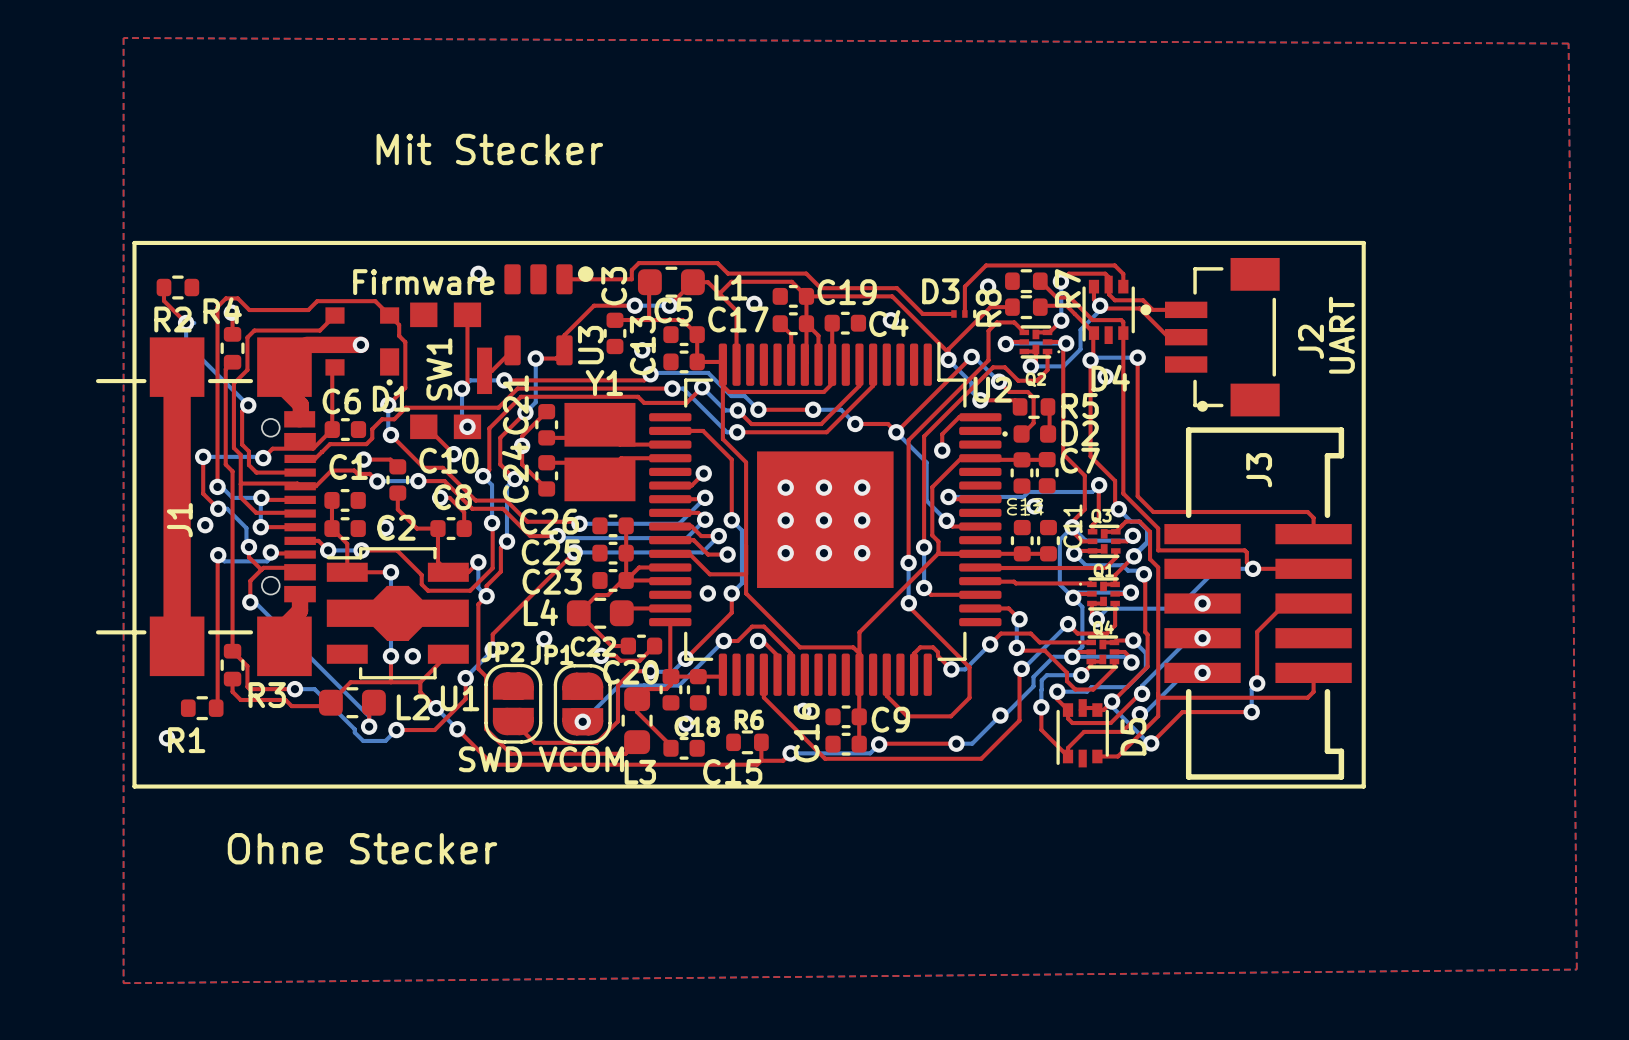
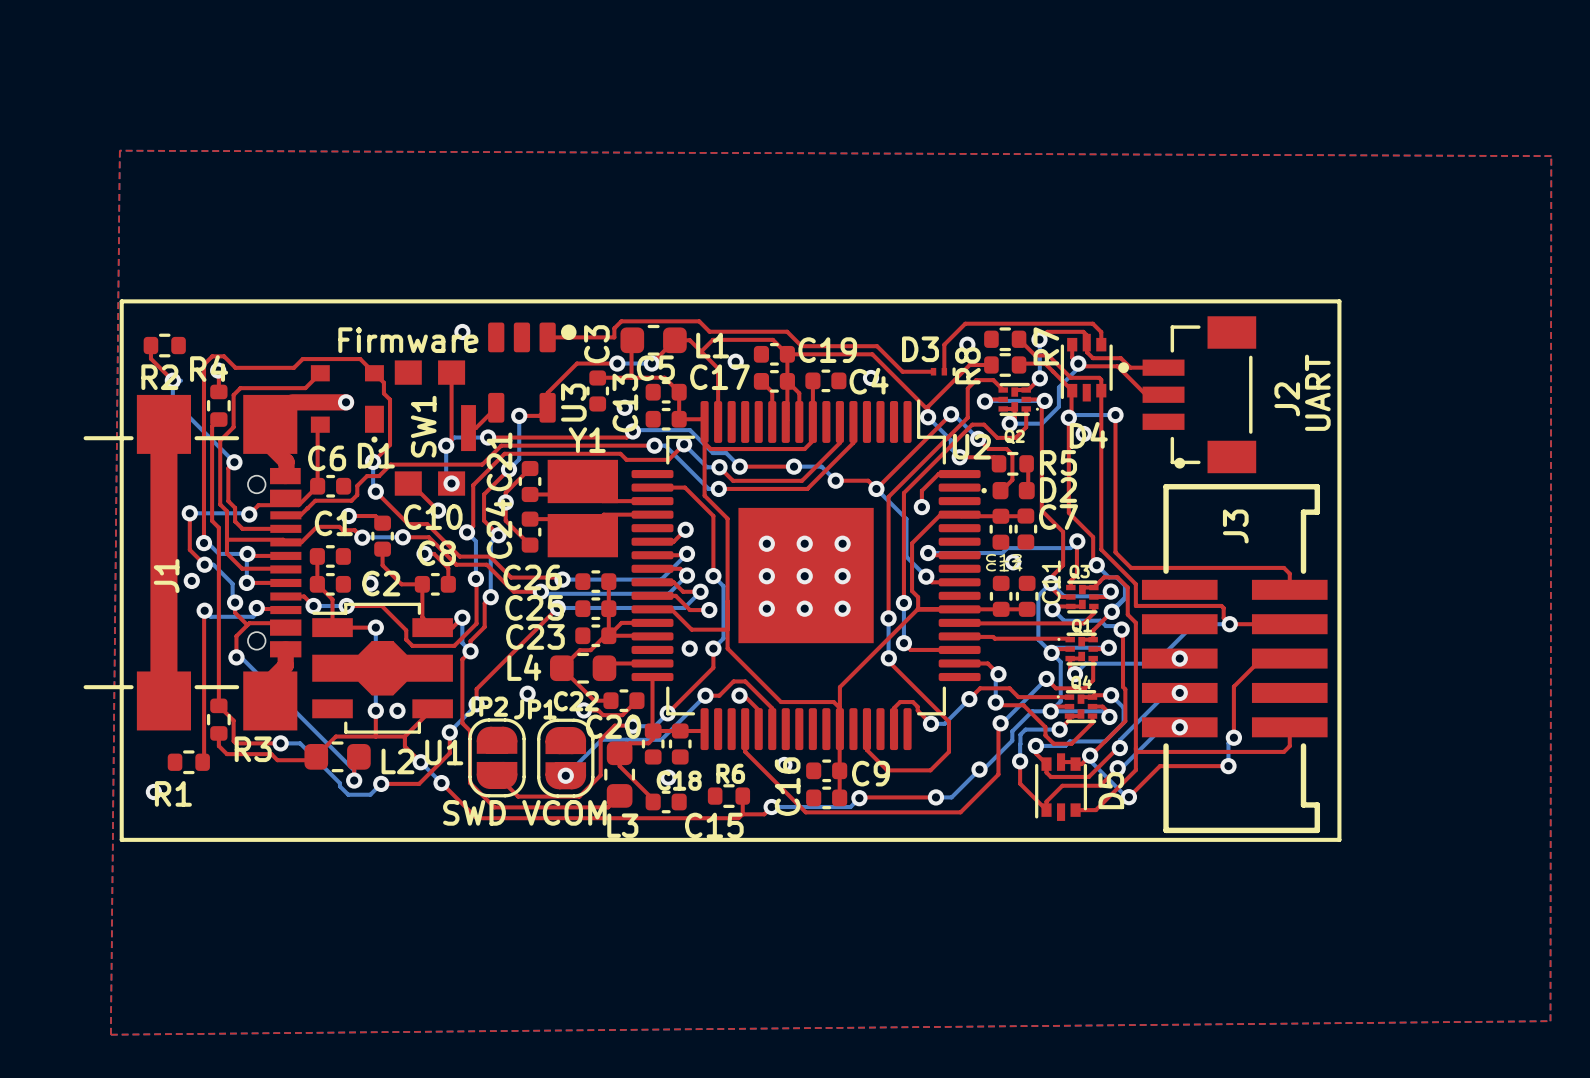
text: Mit Stecker (489, 149) -> none
text: Ohne Stecker (362, 848) -> none
top zone outline: (1576, 969) (1568, 43) (123, 38) (123, 983) -> (1550, 1021) (1551, 156) (119, 150) (110, 1034)

